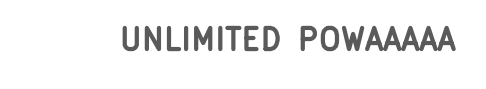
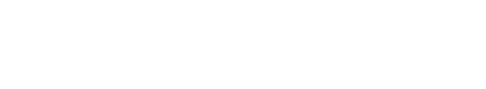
text: UNLIMITED POWAAAAA (289, 38) -> none

